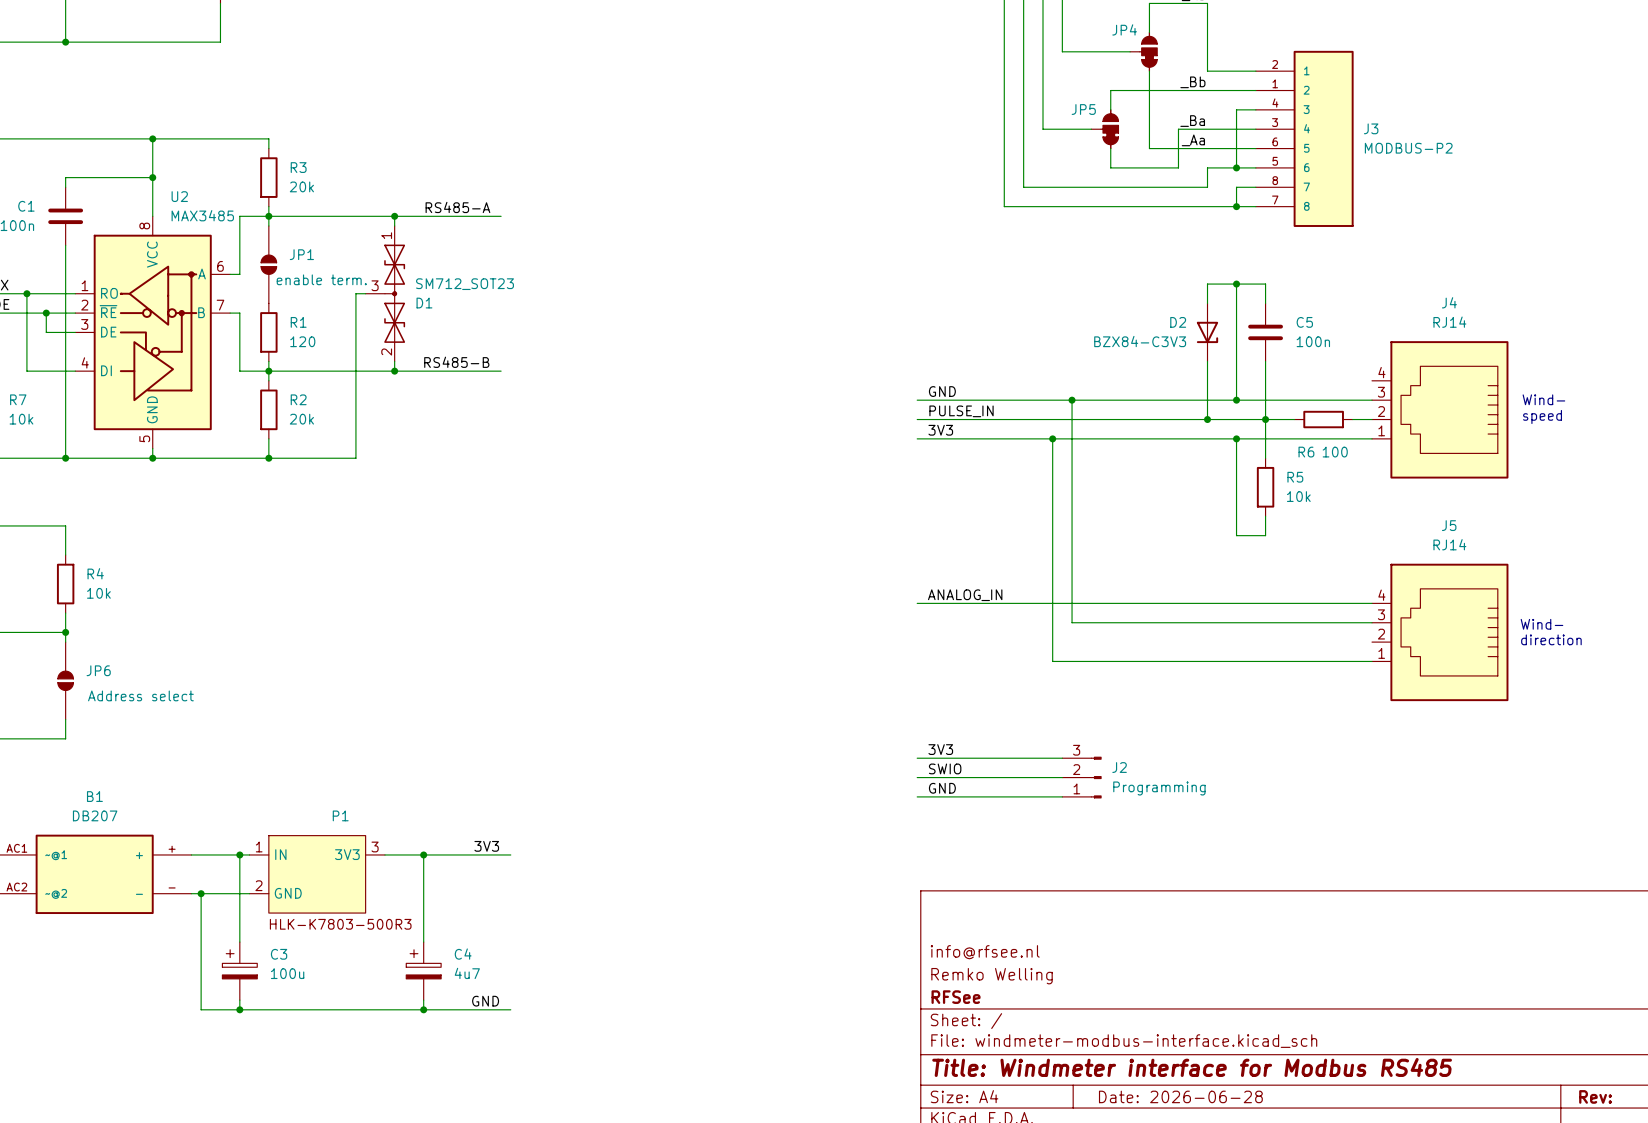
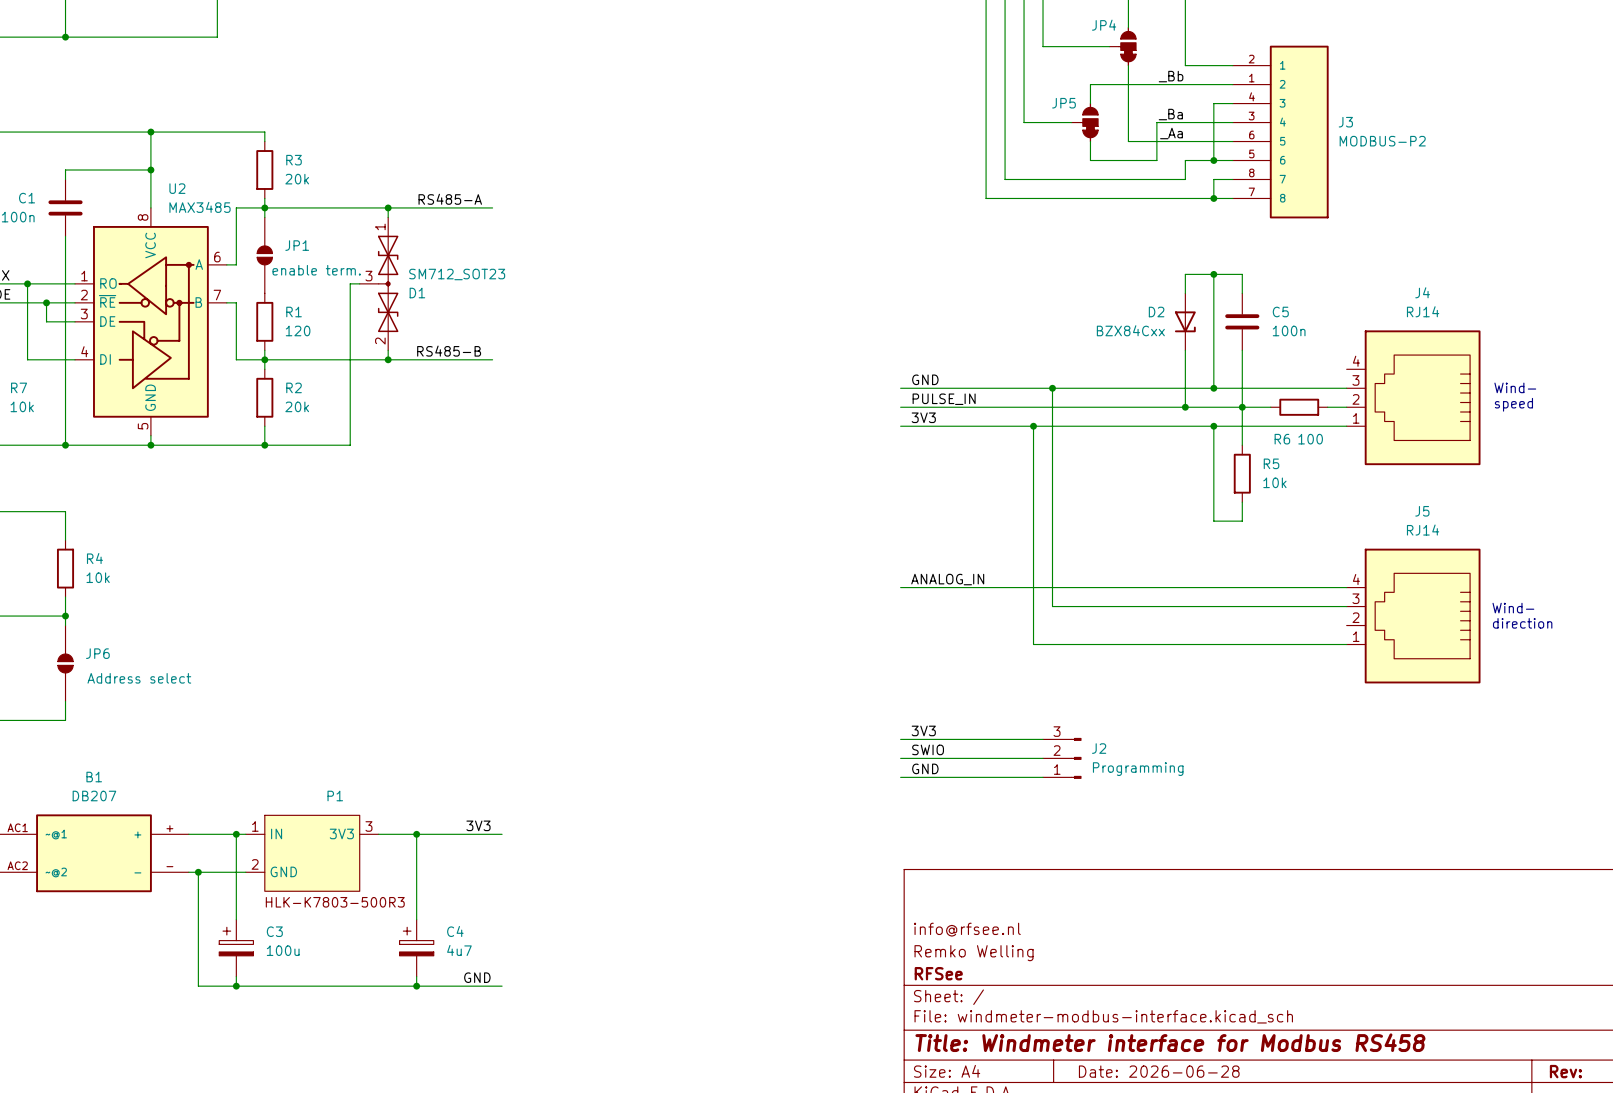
D2 value: BZX84-C3V3 (1140, 341) -> BZX84Cxx (1130, 330)
title block: Title: Windmeter interface for Modbus RS485 (1192, 1067) -> Title: Windmeter interface for Modbus RS458 (1170, 1042)

